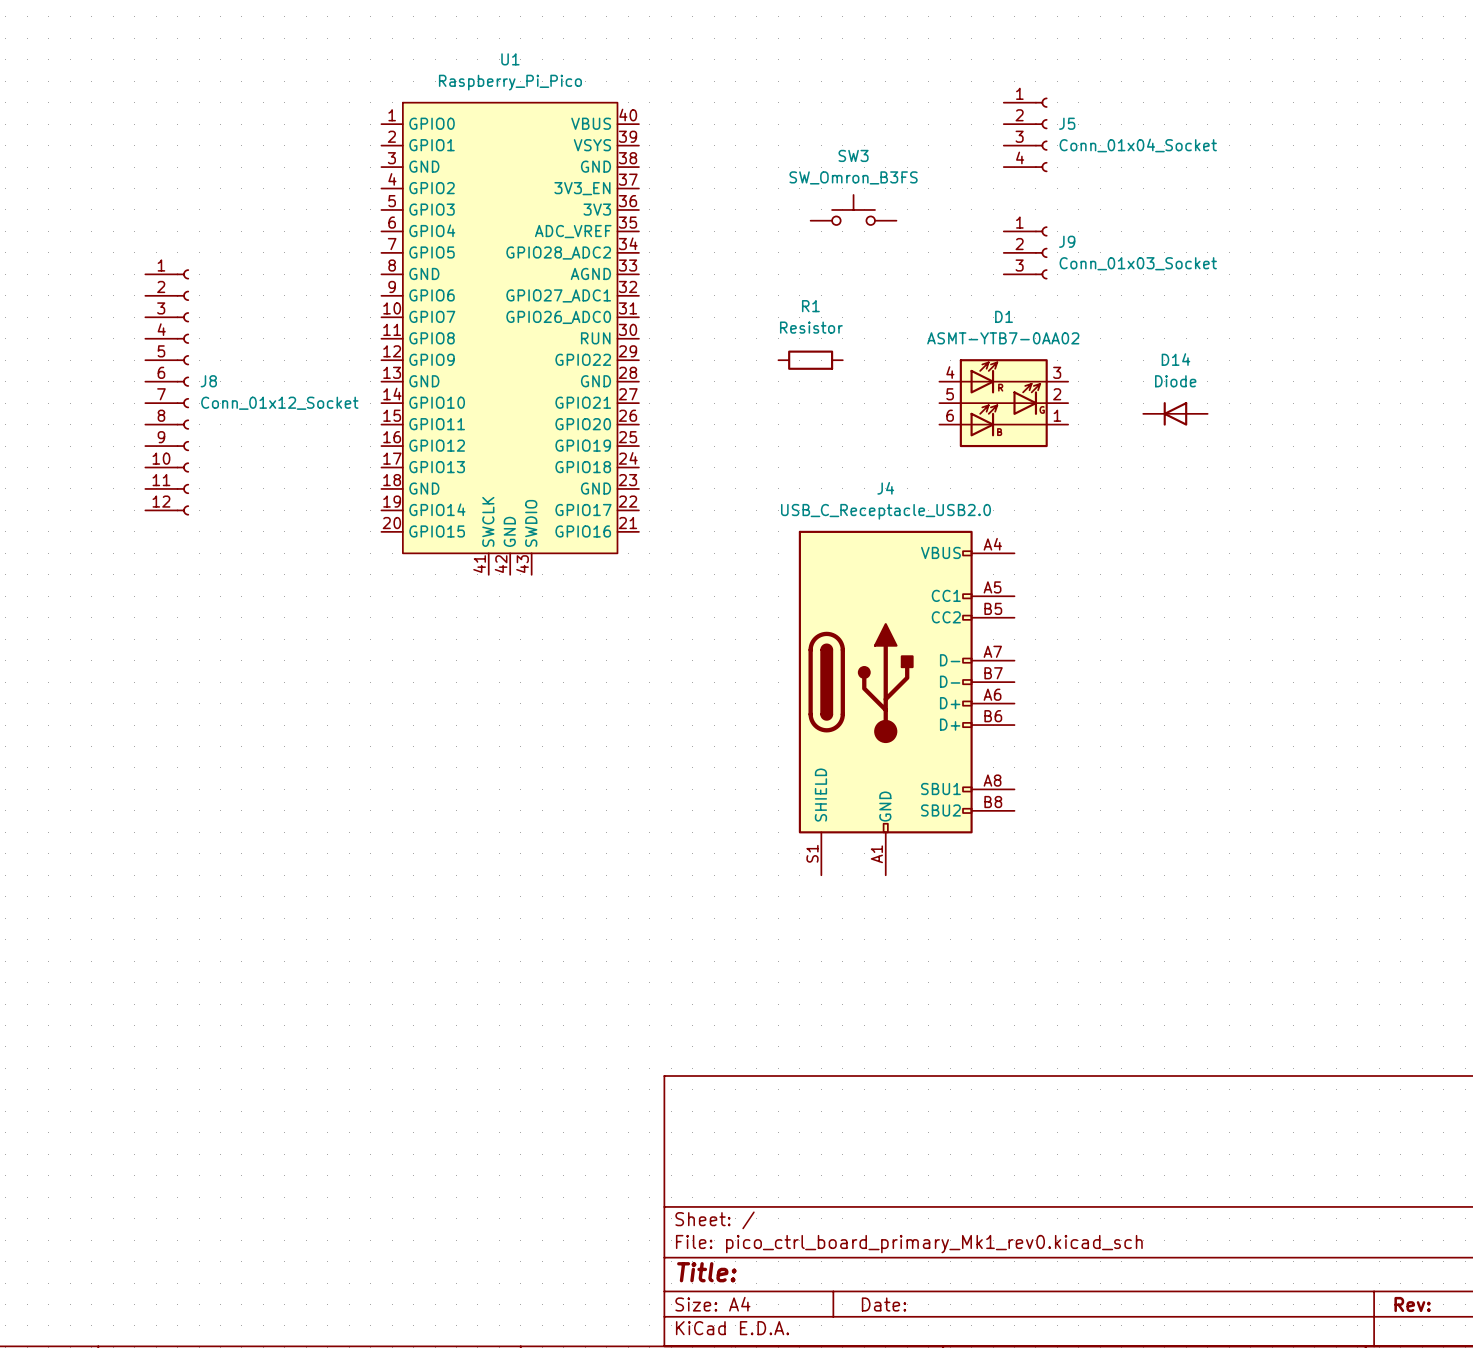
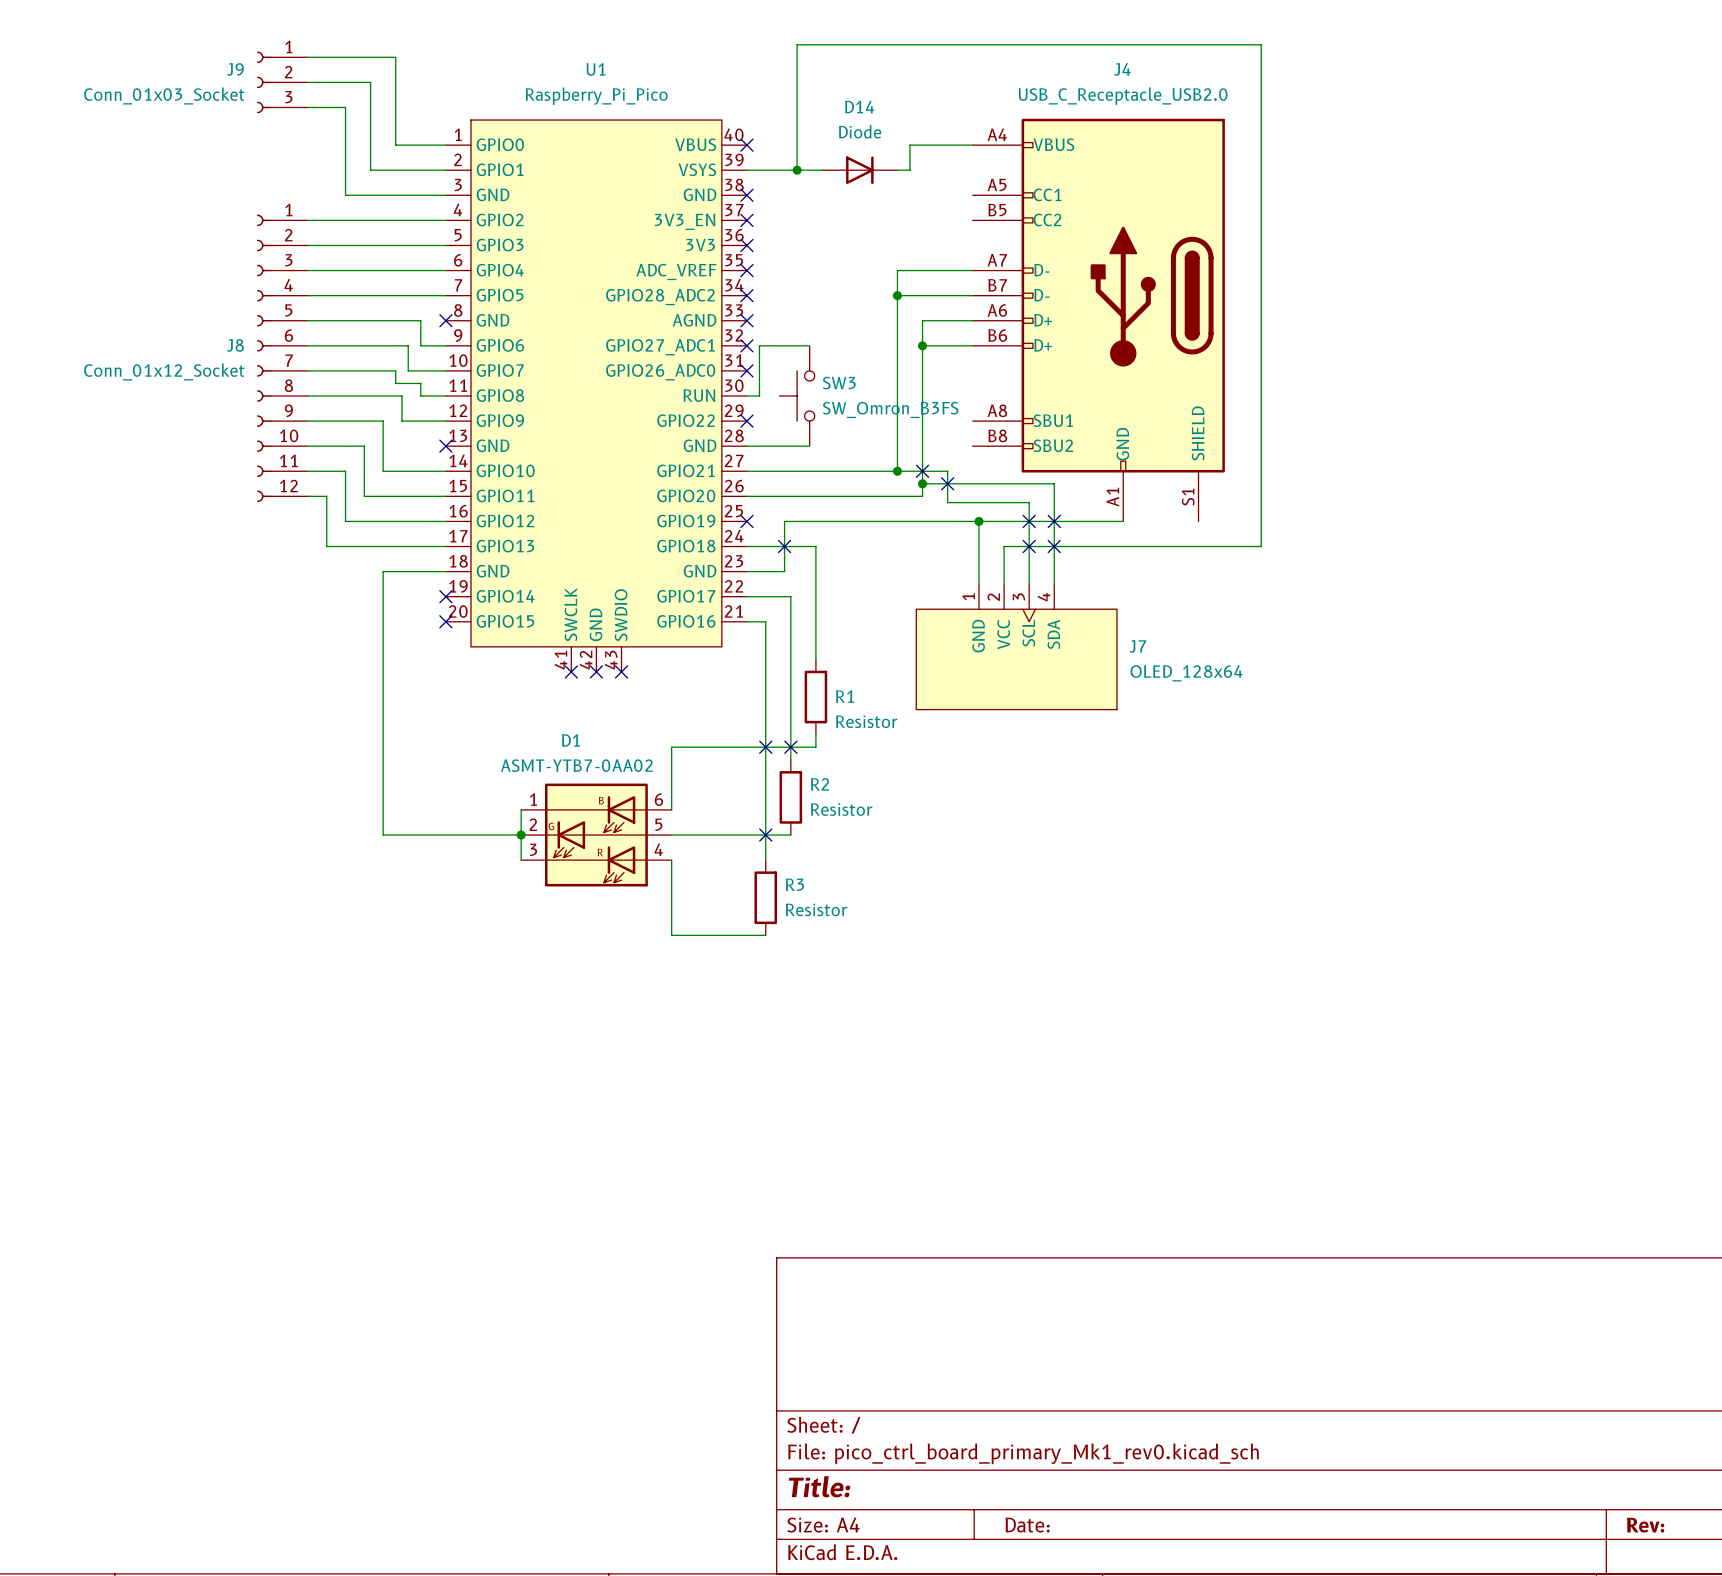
wire: none -> (307, 57) (395, 57) (395, 145) (445, 145)
wire: none -> (307, 82) (370, 82) (370, 170) (445, 170)
wire: none -> (307, 107) (345, 107) (345, 195) (445, 195)
no-connect mark: none -> (746, 145)
wire: none -> (972, 145) (910, 145) (910, 170) (897, 170)
J5: Conn_01x04_Socket (1025, 134) -> none
wire: none -> (746, 170) (822, 170)
wire: none -> (797, 170) (797, 44) (1261, 44) (1261, 546) (1004, 546) (1004, 584)
junction: none -> (797, 170)
SW3 name position: SW3 (853, 155) -> SW3 (839, 383)
no-connect mark: none -> (746, 195)
SW3 value position: SW_Omron_B3FS (853, 177) -> SW_Omron_B3FS (890, 409)
wire: none -> (307, 220) (445, 220)
no-connect mark: none -> (746, 220)
wire: none -> (307, 245) (445, 245)
no-connect mark: none -> (746, 245)
SW3 rotation: 0° (853, 209) -> 90° counterclockwise (797, 395)
SW3 position: (853, 209) -> (797, 395)
wire: none -> (307, 270) (445, 270)
no-connect mark: none -> (746, 270)
wire: none -> (972, 270) (897, 270) (897, 471)
wire: none -> (307, 295) (445, 295)
no-connect mark: none -> (746, 295)
wire: none -> (897, 295) (972, 295)
junction: none -> (897, 295)
J9 position: (1025, 252) -> (282, 82)
J9 flip: as is (1041, 252) -> left-right (264, 82)
wire: none -> (307, 320) (420, 320) (420, 345) (445, 345)
no-connect mark: none -> (445, 320)
no-connect mark: none -> (746, 320)
wire: none -> (972, 320) (922, 320) (922, 496) (746, 496)
wire: none -> (307, 345) (408, 345) (408, 370) (445, 370)
no-connect mark: none -> (746, 345)
wire: none -> (809, 345) (759, 345) (759, 395) (746, 395)
wire: none -> (922, 345) (972, 345)
junction: none -> (922, 345)
R1 name position: R1 (810, 306) -> R1 (845, 696)
D1 name position: D1 (1004, 316) -> D1 (570, 740)
wire: none -> (307, 370) (395, 370) (395, 383) (420, 383) (420, 395) (445, 395)
no-connect mark: none -> (746, 370)
R1 value position: Resistor (811, 327) -> Resistor (866, 721)
wire: none -> (307, 395) (401, 395) (401, 421) (445, 421)
D1 value position: ASMT-YTB7-0AA02 (1003, 338) -> ASMT-YTB7-0AA02 (576, 765)
wire: none -> (307, 421) (383, 421) (383, 471) (445, 471)
no-connect mark: none -> (746, 421)
R1 rotation: 0° (810, 360) -> 90° clockwise (815, 697)
R1 position: (810, 360) -> (815, 697)
wire: none -> (307, 446) (364, 446) (364, 496) (445, 496)
no-connect mark: none -> (445, 446)
wire: none -> (746, 446) (809, 446)
J8 flip: as is (182, 392) -> left-right (264, 358)
wire: none -> (307, 471) (345, 471) (345, 521) (445, 521)
wire: none -> (746, 471) (947, 471) (947, 502) (1029, 502) (1029, 584)
junction: none -> (897, 471)
no-connect mark: none -> (922, 471)
D1 rotation: 0° (1003, 403) -> 180° (596, 835)
D1 position: (1003, 403) -> (596, 835)
wire: none -> (922, 483) (1054, 483) (1054, 584)
junction: none -> (922, 483)
no-connect mark: none -> (947, 483)
D14 rotation: 0° (1175, 413) -> 180° (859, 170)
D14 position: (1175, 413) -> (859, 170)
wire: none -> (307, 496) (326, 496) (326, 546) (445, 546)
no-connect mark: none -> (746, 521)
wire: none -> (978, 521) (978, 584)
junction: none -> (978, 521)
no-connect mark: none -> (1029, 521)
no-connect mark: none -> (1054, 521)
wire: none -> (1123, 521) (784, 521) (784, 571) (746, 571)
wire: none -> (746, 546) (815, 546) (815, 659)
no-connect mark: none -> (784, 546)
no-connect mark: none -> (1029, 546)
no-connect mark: none -> (1054, 546)
wire: none -> (445, 571) (383, 571) (383, 835) (521, 835)
no-connect mark: none -> (445, 596)
wire: none -> (746, 596) (790, 596) (790, 759)
no-connect mark: none -> (445, 621)
wire: none -> (746, 621) (765, 621) (765, 860)
J7: none -> OLED_128x64 (1016, 646)
no-connect mark: none -> (571, 671)
no-connect mark: none -> (596, 671)
no-connect mark: none -> (621, 671)
wire: none -> (815, 734) (815, 747) (671, 747) (671, 809)
no-connect mark: none -> (765, 747)
no-connect mark: none -> (790, 747)
R2: none -> Resistor (790, 797)
J4 flip: as is (885, 682) -> left-right (1123, 295)
wire: none -> (521, 809) (521, 860)
J4 position: (906, 703) -> (1098, 320)
junction: none -> (521, 835)
wire: none -> (671, 835) (790, 835)
no-connect mark: none -> (765, 835)
wire: none -> (671, 860) (671, 935) (765, 935)
R3: none -> Resistor (765, 897)

